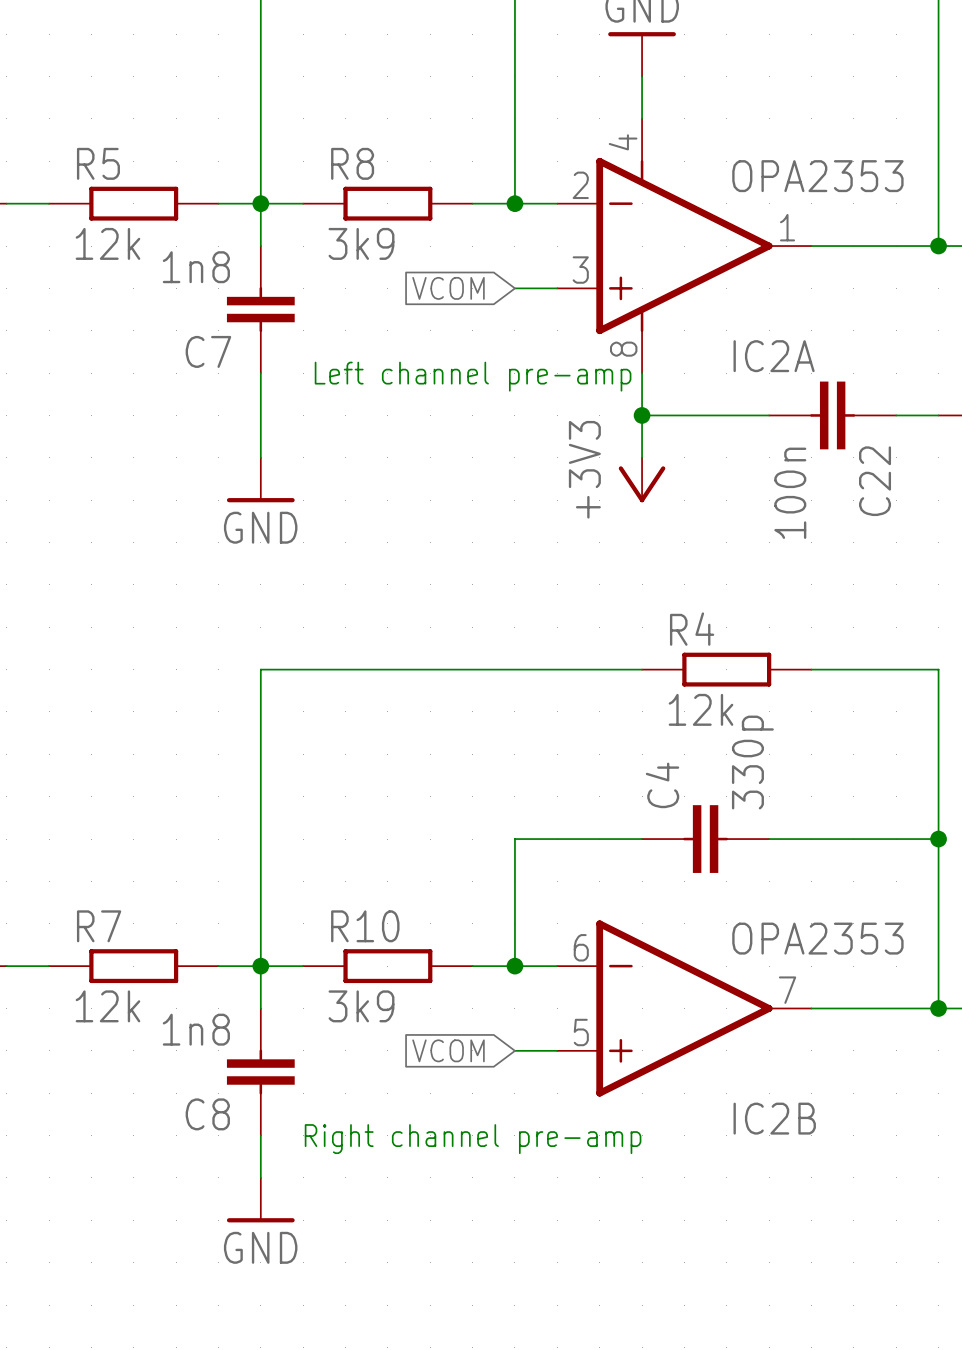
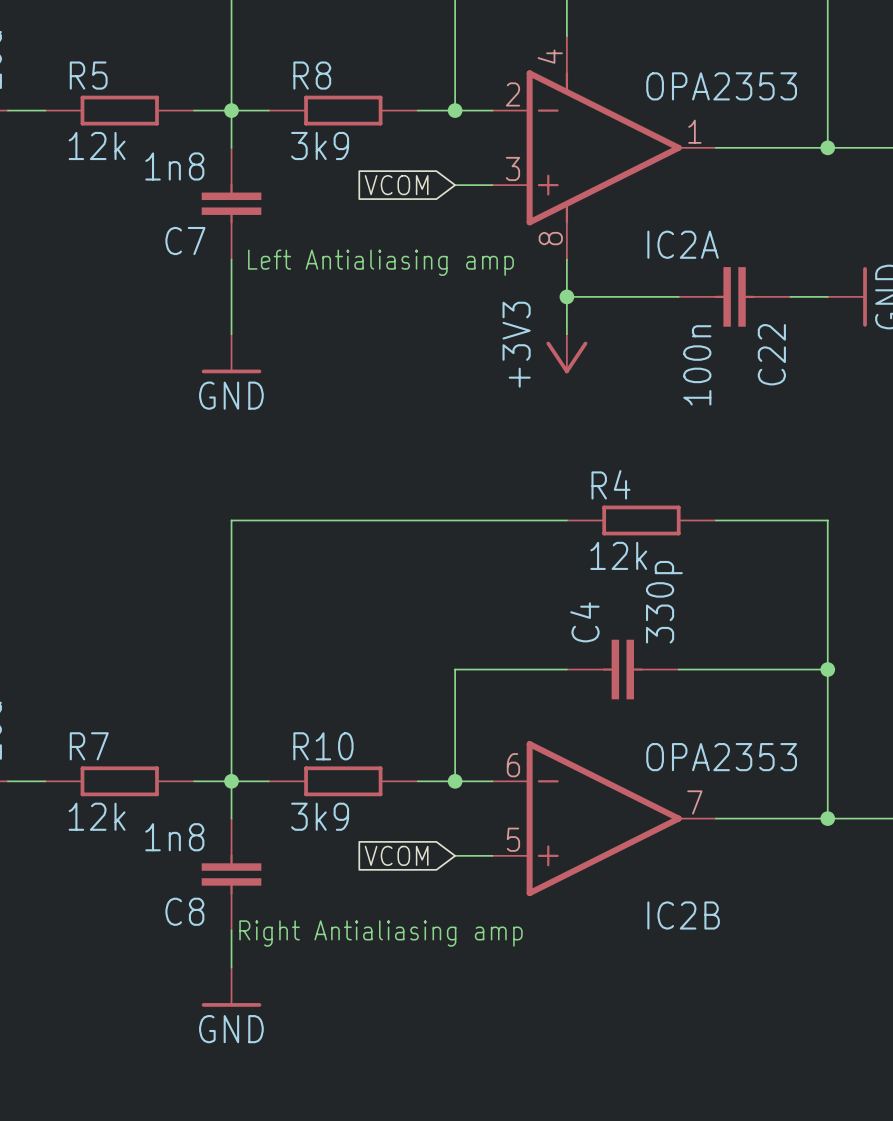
text: none -> Left Antialiasing amp (380, 262)
text: Left channel pre-amp (473, 376) -> none
text: none -> Right Antialiasing amp (380, 933)
text: Right channel pre-amp (473, 1139) -> none

